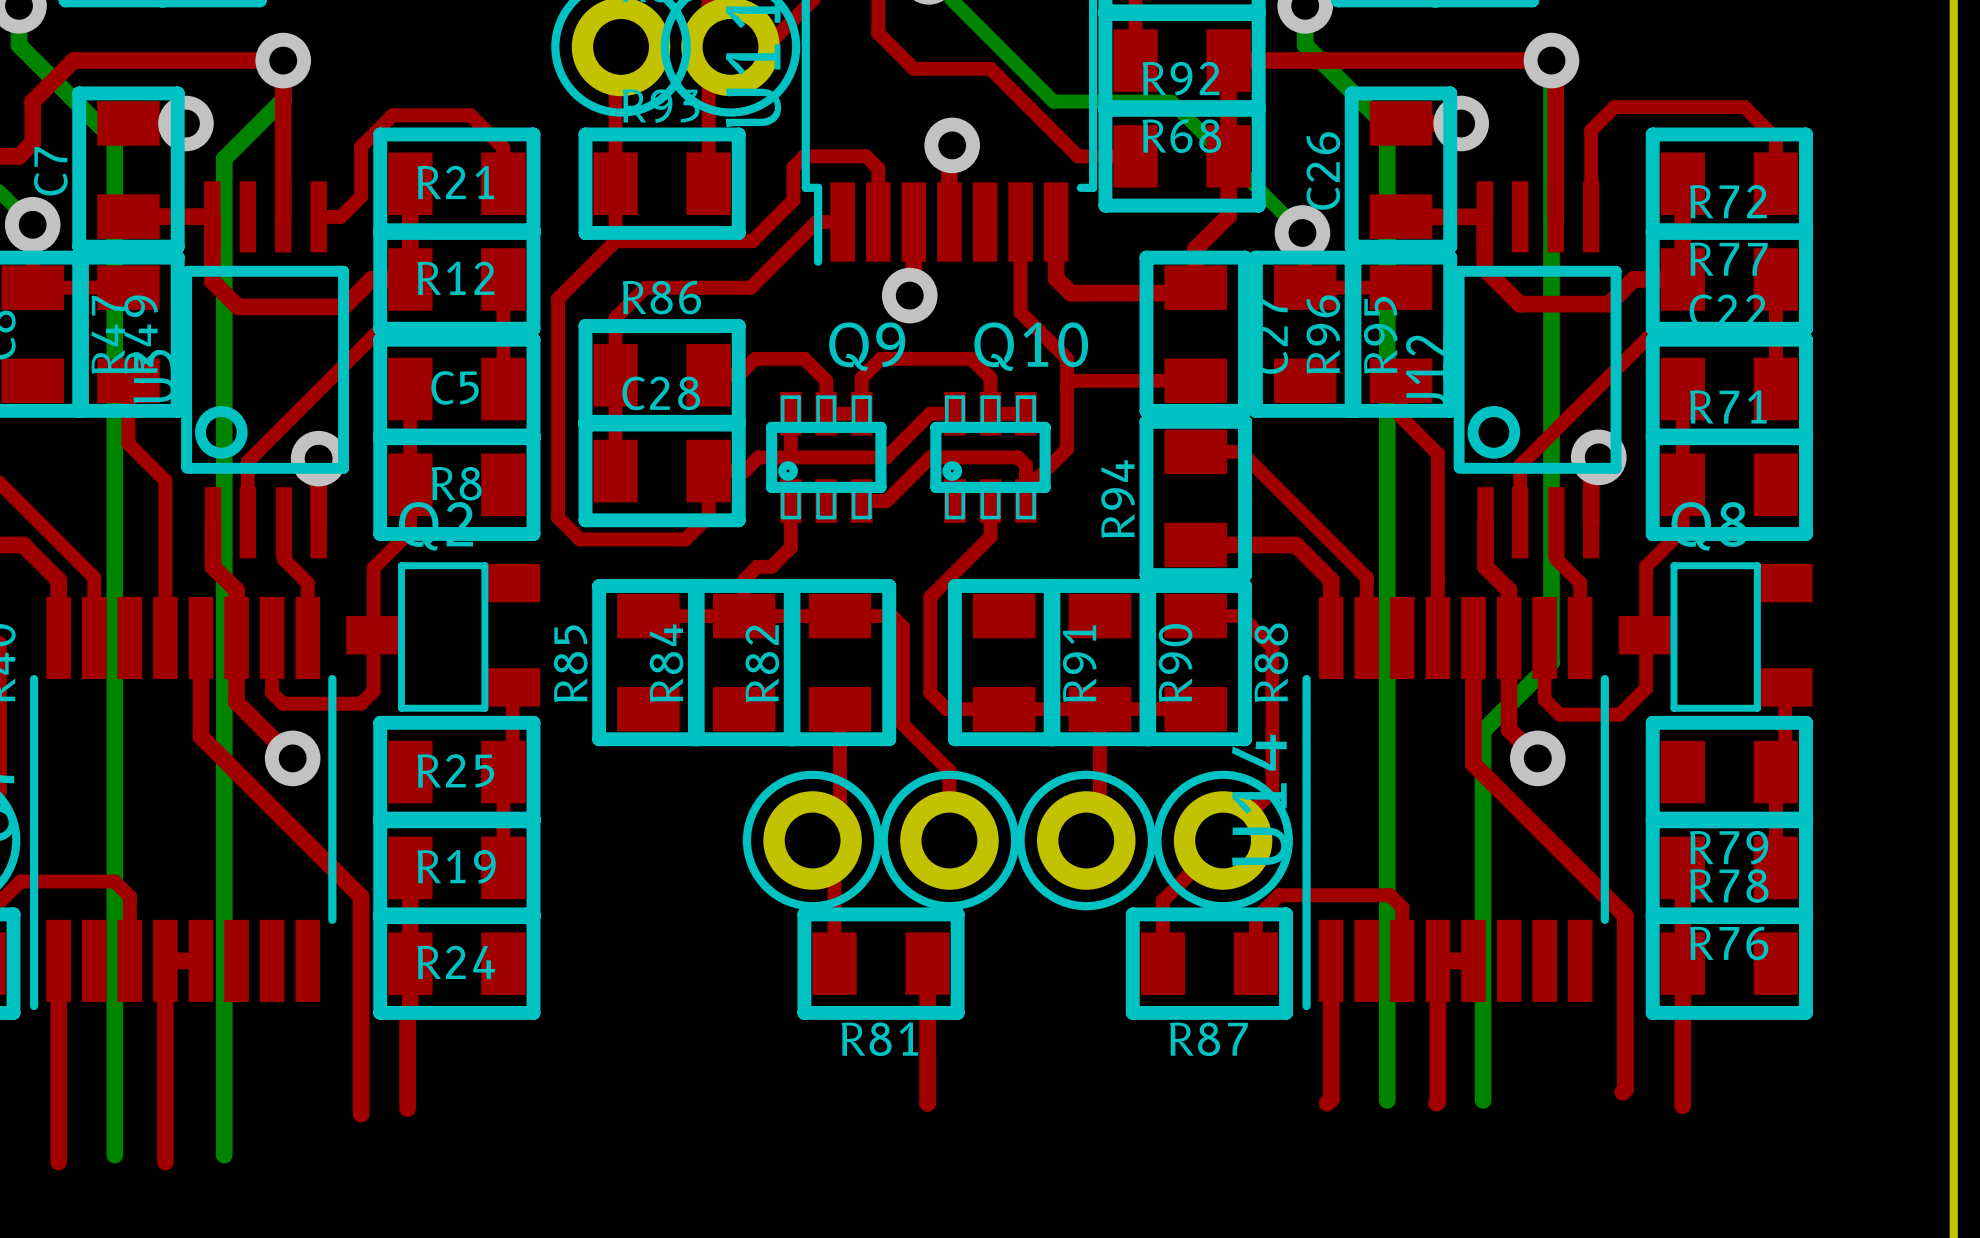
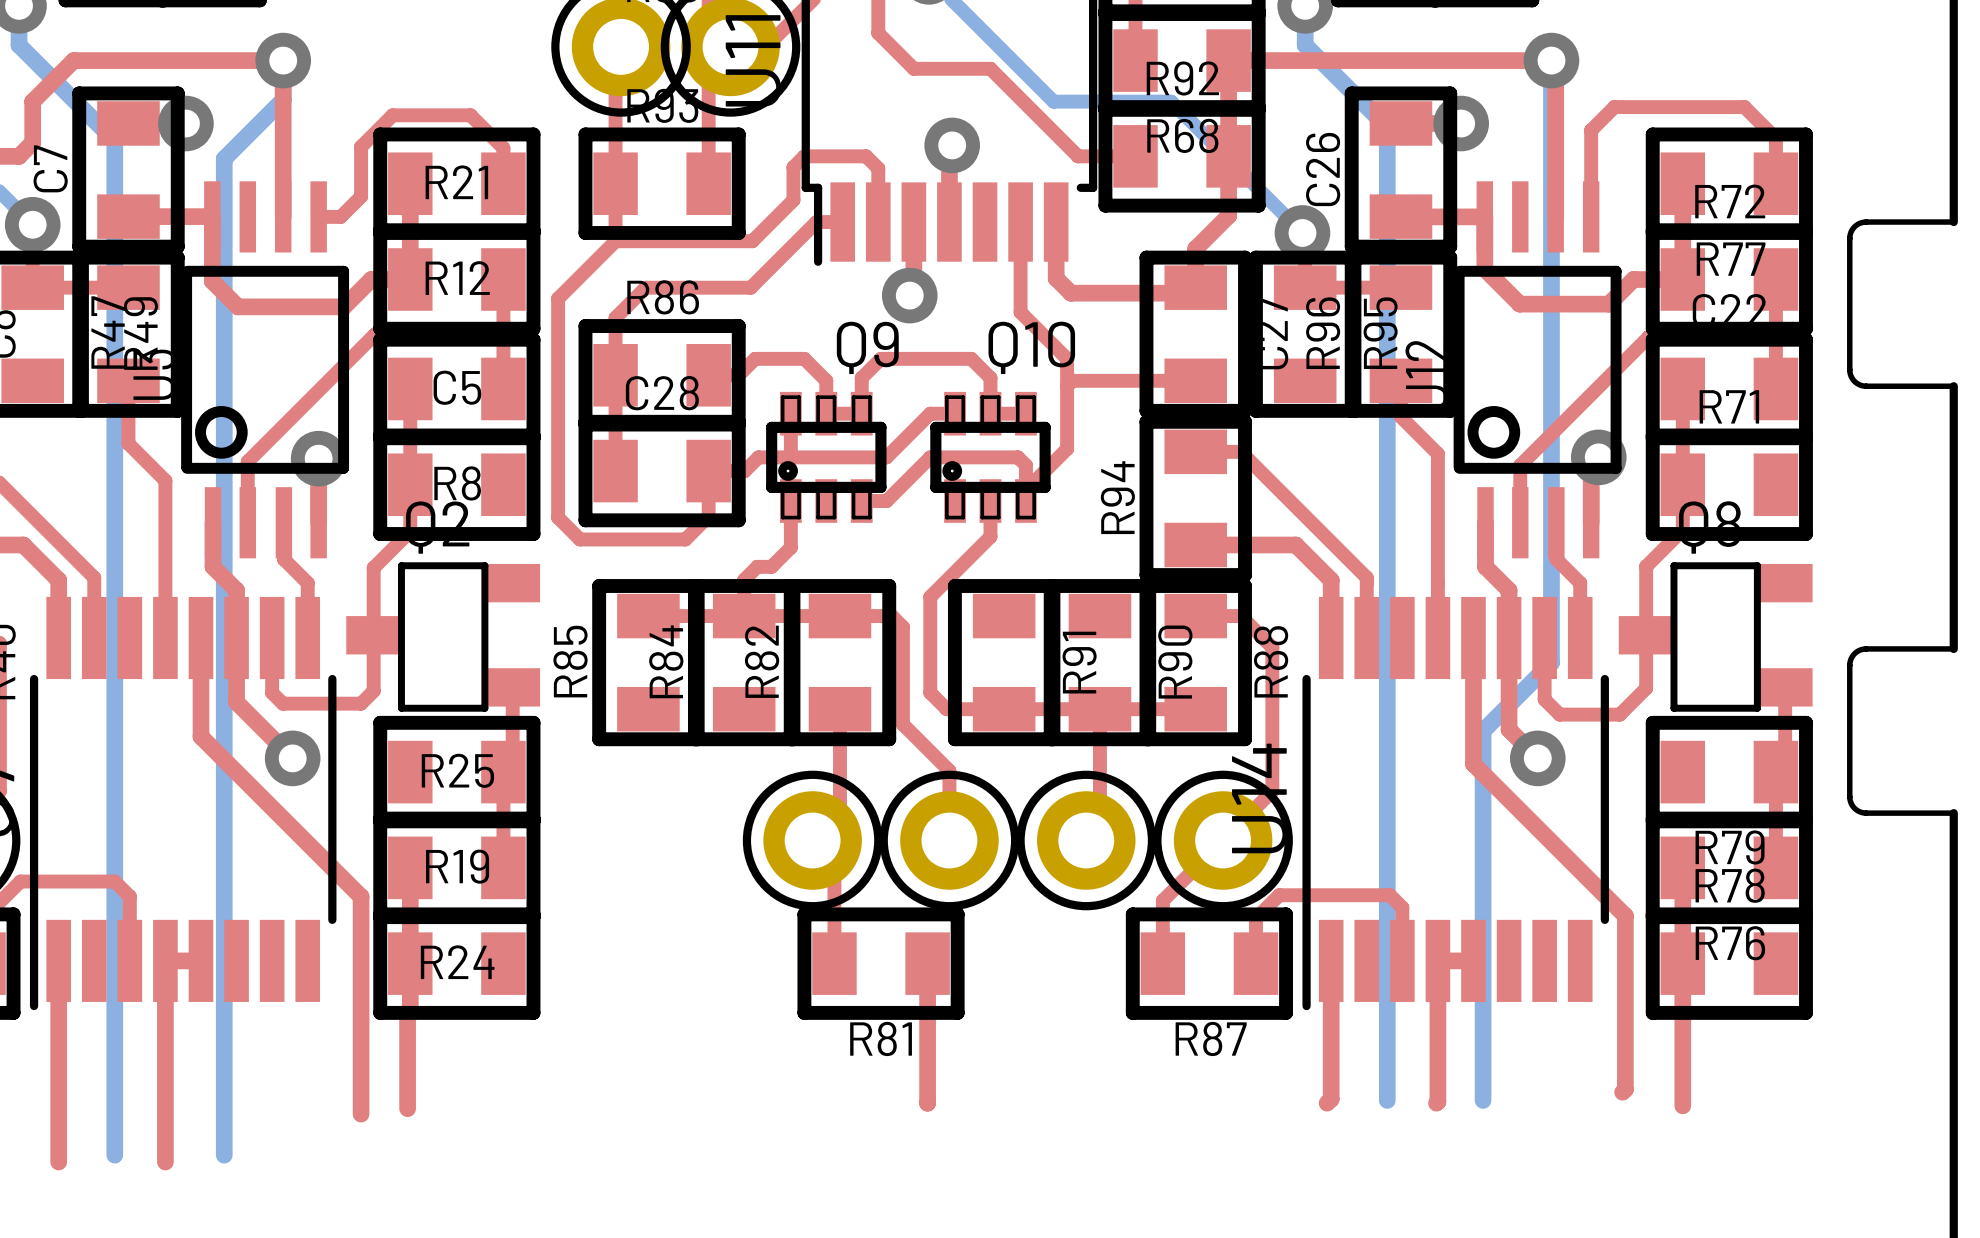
board edge: (1953, 222) (1953, 386) -> (1953, 222) (1864, 222) (1854, 226) (1849, 238) (1849, 369) (1853, 379) (1859, 384) (1866, 386) (1953, 386)
board edge: (1953, 648) (1953, 813) -> (1953, 648) (1864, 649) (1854, 653) (1849, 665) (1849, 796) (1853, 806) (1859, 811) (1866, 813) (1953, 813)

